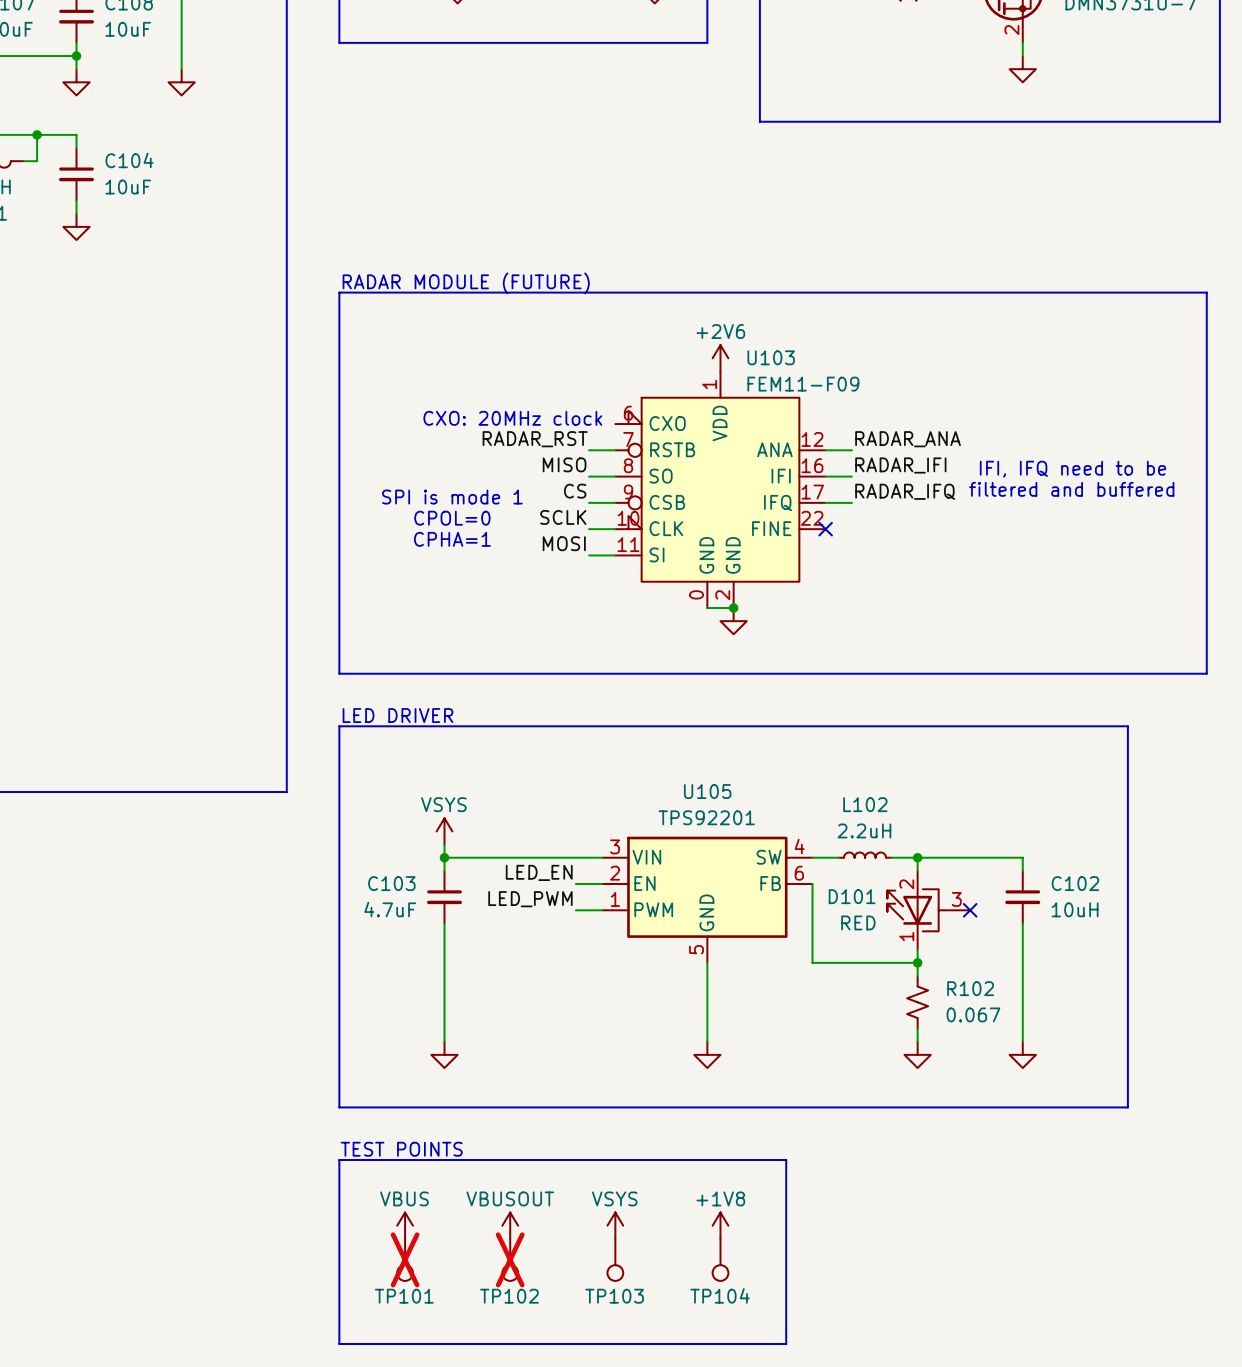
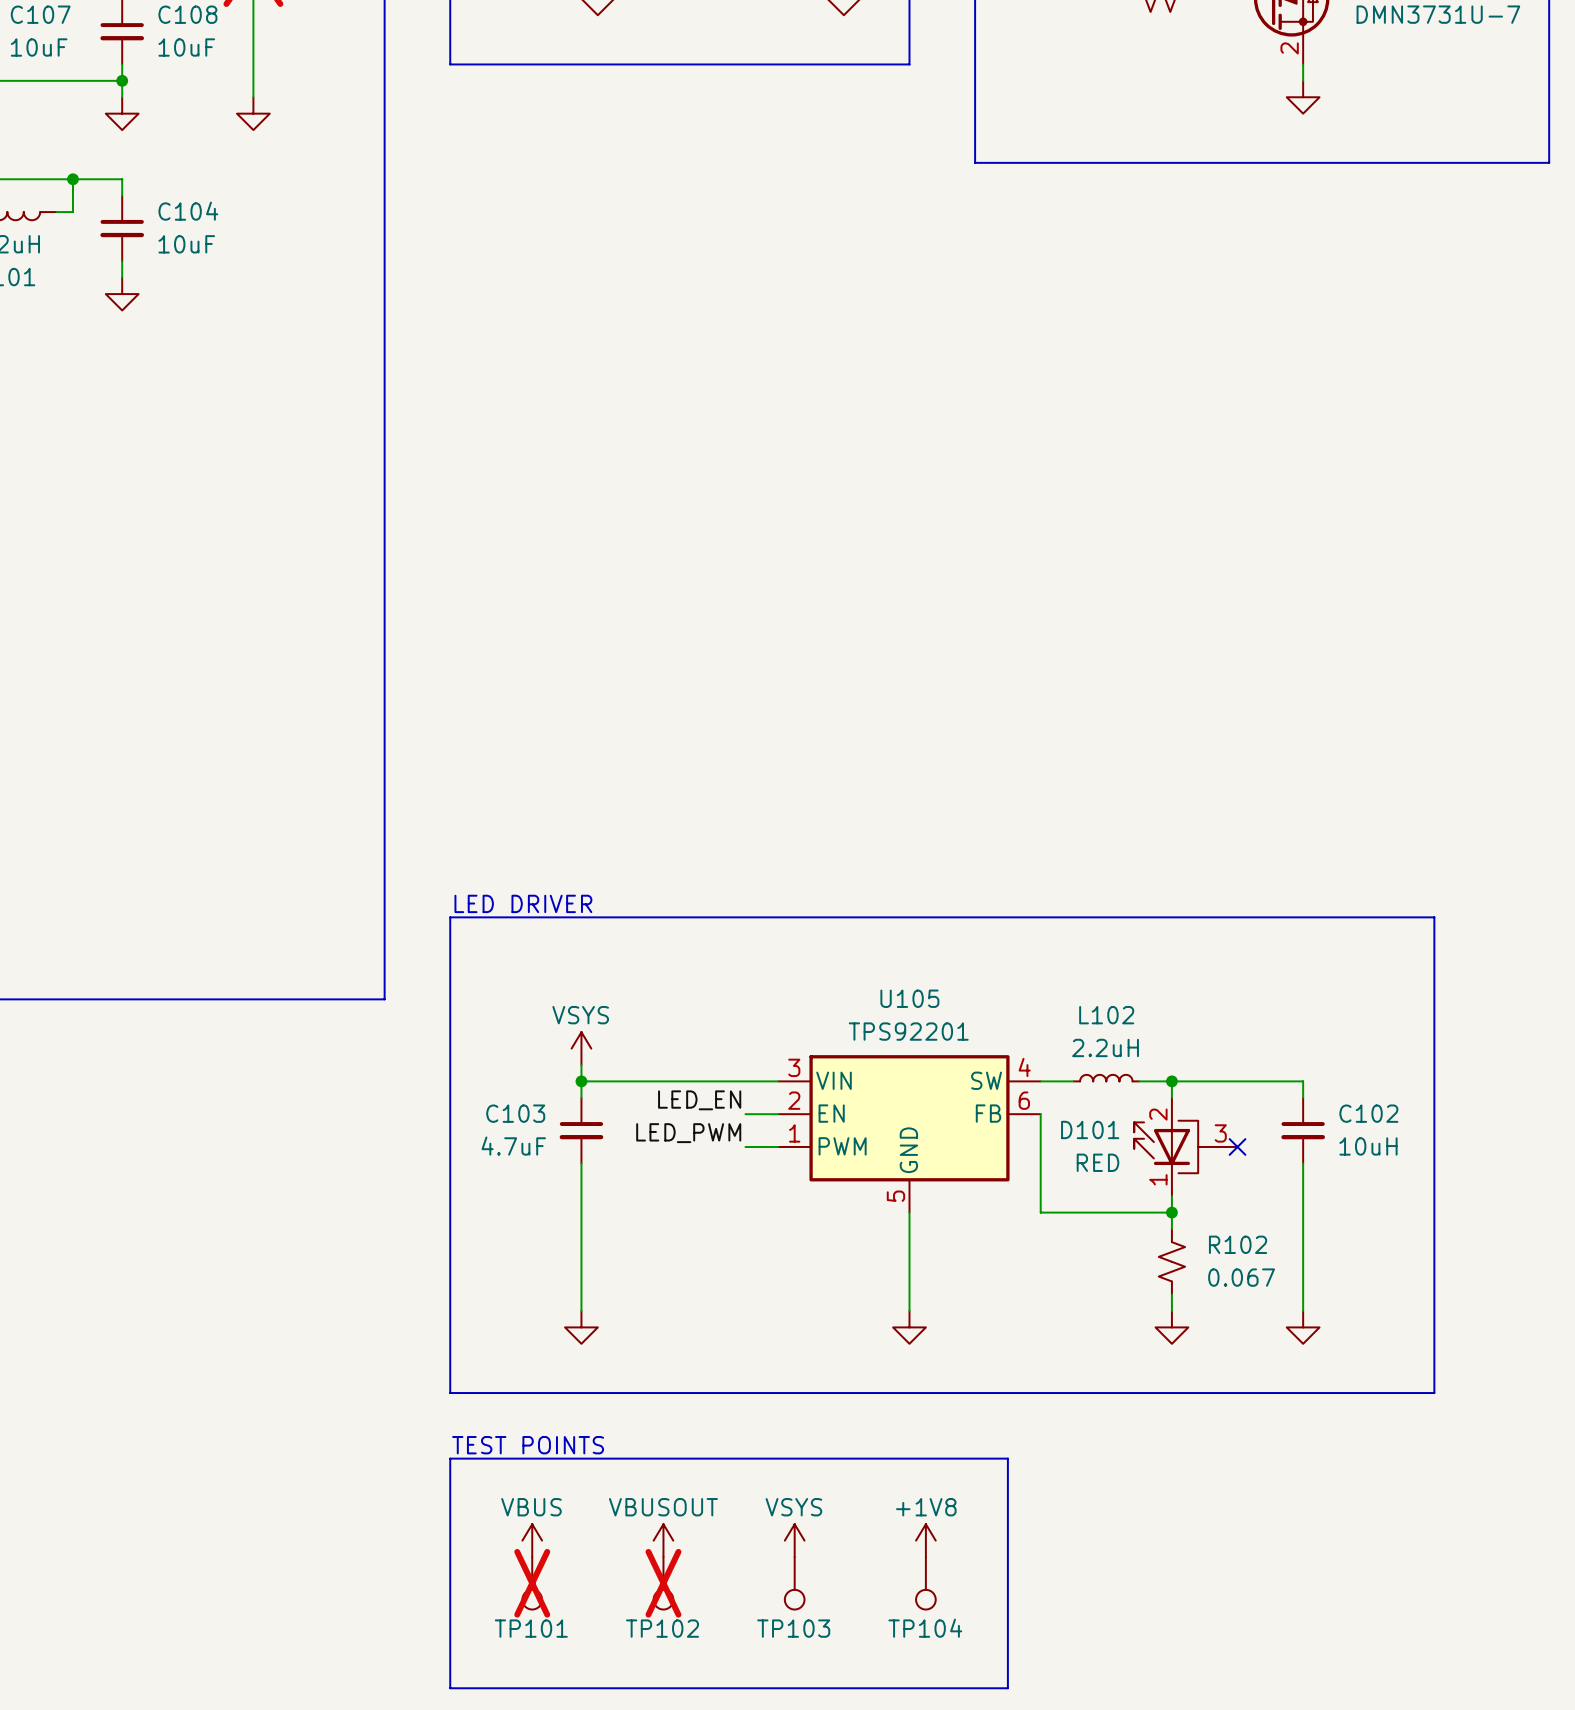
text: RADAR MODULE (FUTURE) (466, 283) -> none
line: (339, 292) (1206, 292) (1206, 673) (339, 673) (339, 292) -> none
power symbol: +2V6 (720, 358) -> none
text: CXO: 20MHz clock (512, 418) -> none
label: RADAR_RST (535, 439) -> none
label: RADAR_ANA (908, 439) -> none
wire: (589, 450) (615, 450) -> none
wire: (825, 450) (851, 450) -> none
label: MISO (564, 464) -> none
label: RADAR_IFI (900, 465) -> none
text: IFI, IFQ need to be (1073, 469) -> none
wire: (589, 476) (615, 476) -> none
wire: (825, 476) (851, 476) -> none
U103: FEM11-F09 (720, 489) -> none
text: filtered and buffered (1071, 489) -> none
label: CS (575, 491) -> none
label: RADAR_IFQ (905, 491) -> none
text: SPI is mode 1 (452, 497) -> none
wire: (589, 502) (615, 502) -> none
wire: (825, 502) (851, 502) -> none
label: SCLK (563, 517) -> none
text: CPOL=0 (452, 518) -> none
wire: (589, 529) (615, 529) -> none
no-connect mark: (825, 529) -> none
text: CPHA=1 (452, 539) -> none
label: MOSI (564, 543) -> none
wire: (589, 555) (615, 555) -> none
wire: (707, 608) (733, 608) -> none
junction: (733, 608) -> none
power symbol: (733, 621) -> none

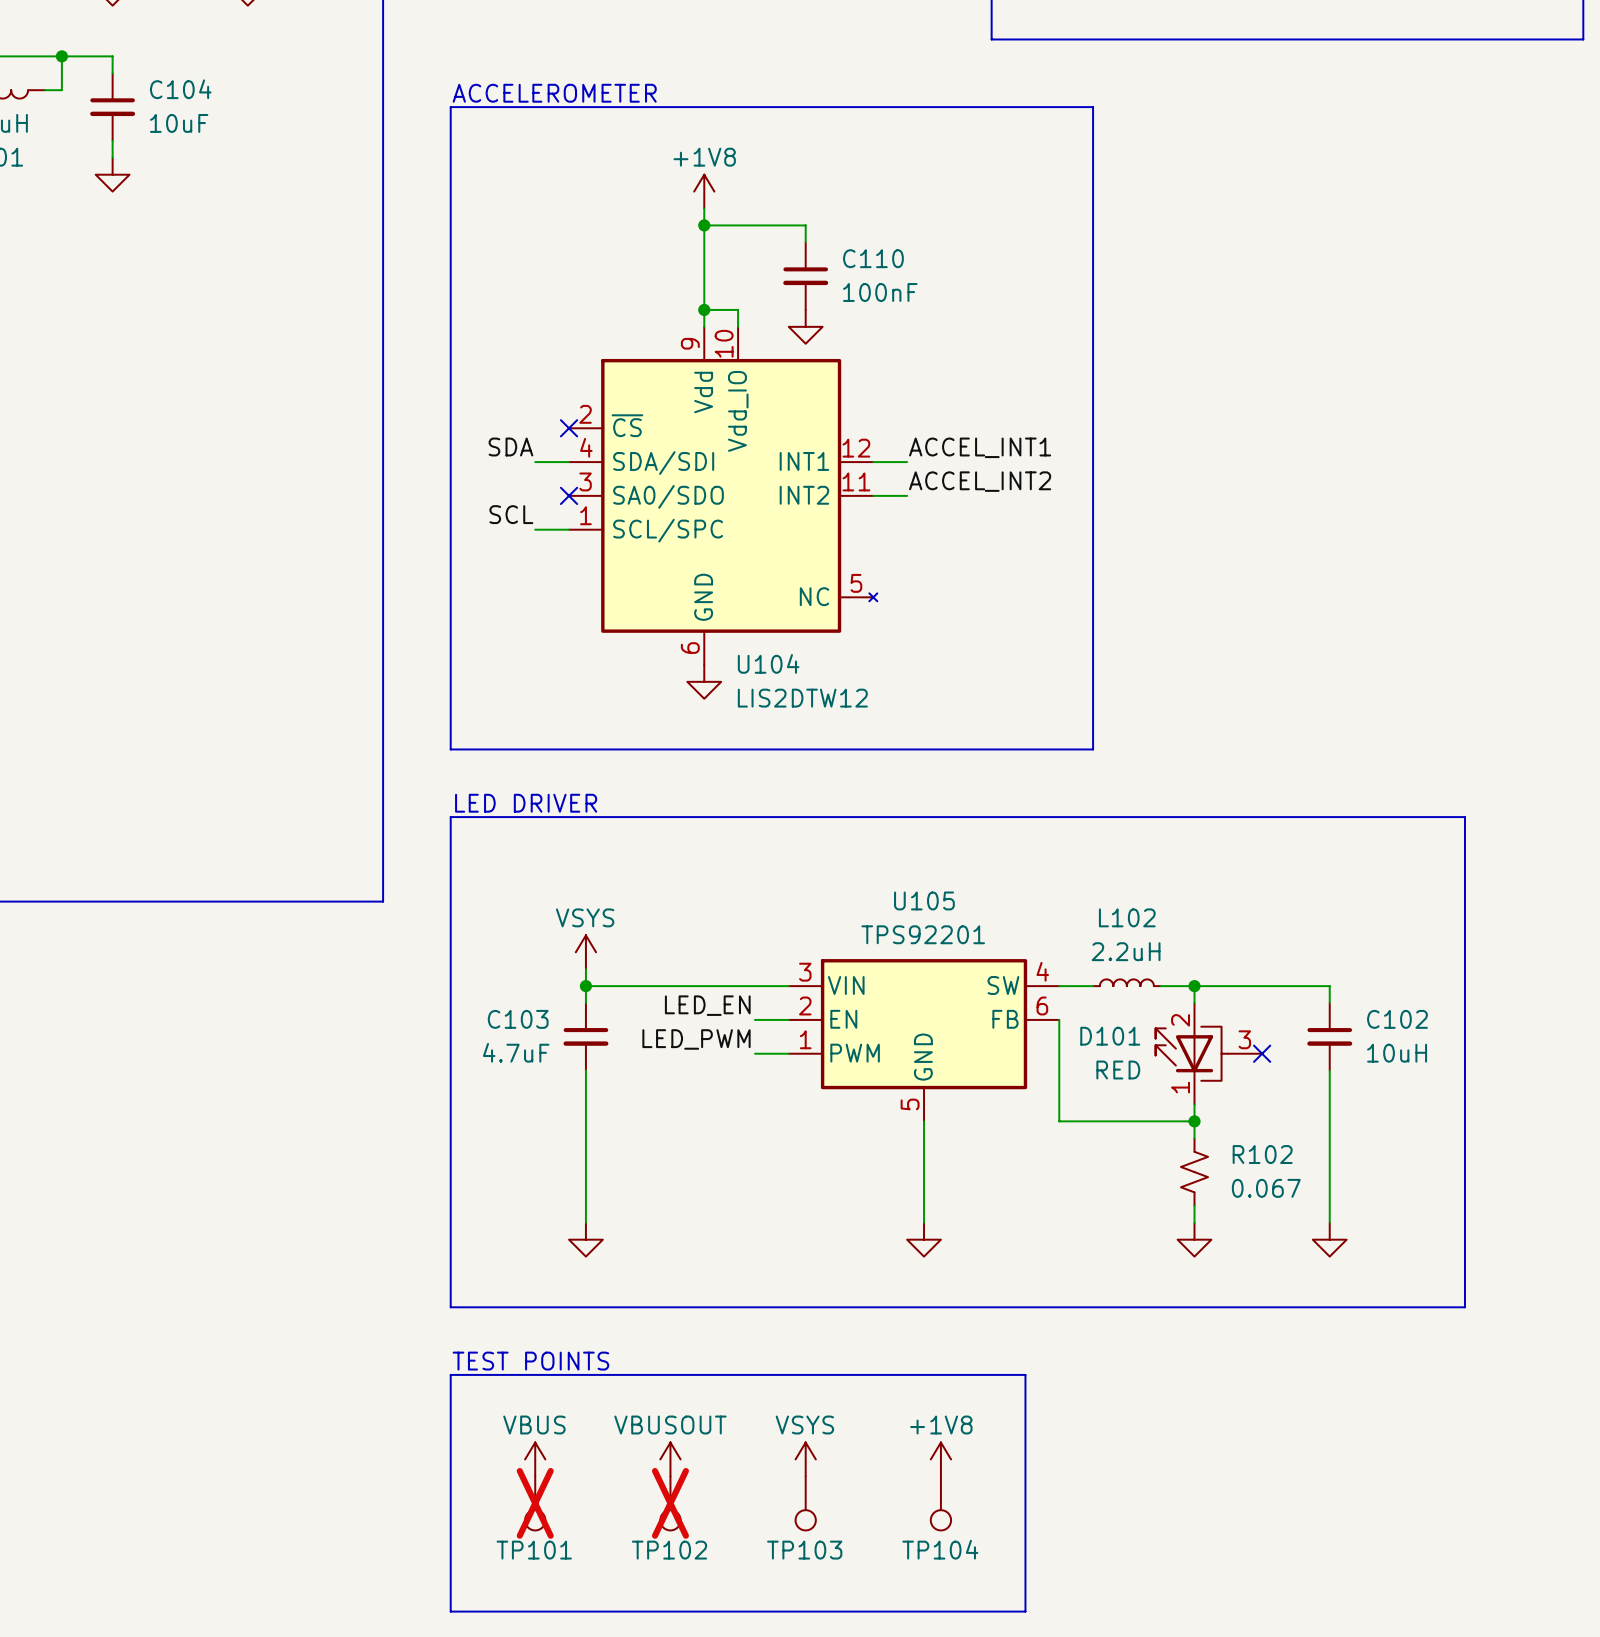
text: none -> ACCELEROMETER (554, 93)
line: none -> (450, 107) (1093, 107) (1093, 749) (450, 749) (450, 107)
power symbol: none -> +1V8 (704, 191)
wire: none -> (704, 208) (704, 326)
wire: none -> (704, 225) (805, 225) (805, 242)
junction: none -> (704, 225)
C110: none -> 100nF (805, 276)
wire: none -> (704, 309) (738, 309) (738, 326)
junction: none -> (704, 309)
power symbol: none -> (805, 326)
no-connect mark: none -> (569, 428)
label: none -> SDA (510, 447)
label: none -> ACCEL_INT1 (980, 447)
wire: none -> (535, 462) (569, 462)
wire: none -> (873, 462) (907, 462)
label: none -> ACCEL_INT2 (980, 481)
no-connect mark: none -> (569, 495)
U104: none -> LIS2DTW12 (723, 495)
wire: none -> (873, 495) (907, 495)
label: none -> SCL (511, 514)
wire: none -> (535, 529) (569, 529)
power symbol: none -> (704, 681)

